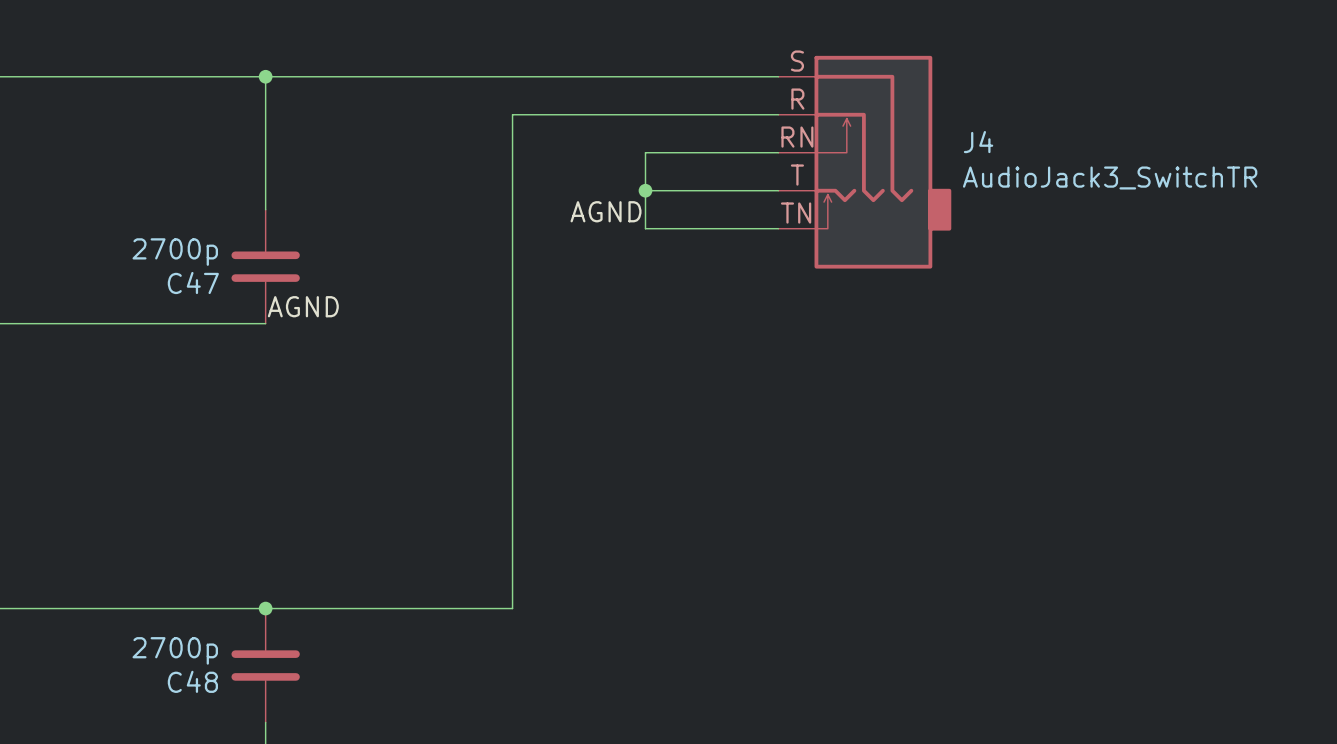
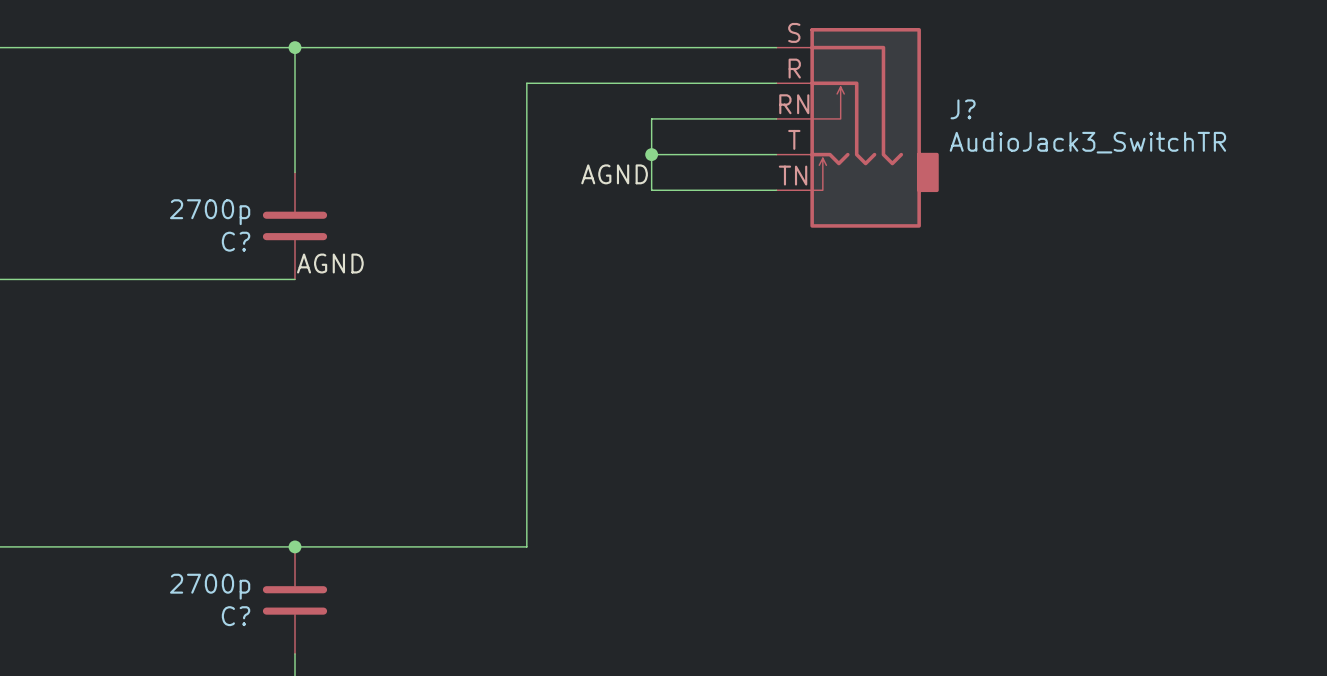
J4 name: J4 (978, 142) -> J? (963, 109)
C47 name: C47 (193, 282) -> C? (236, 241)
C48 name: C48 (192, 681) -> C? (236, 616)

